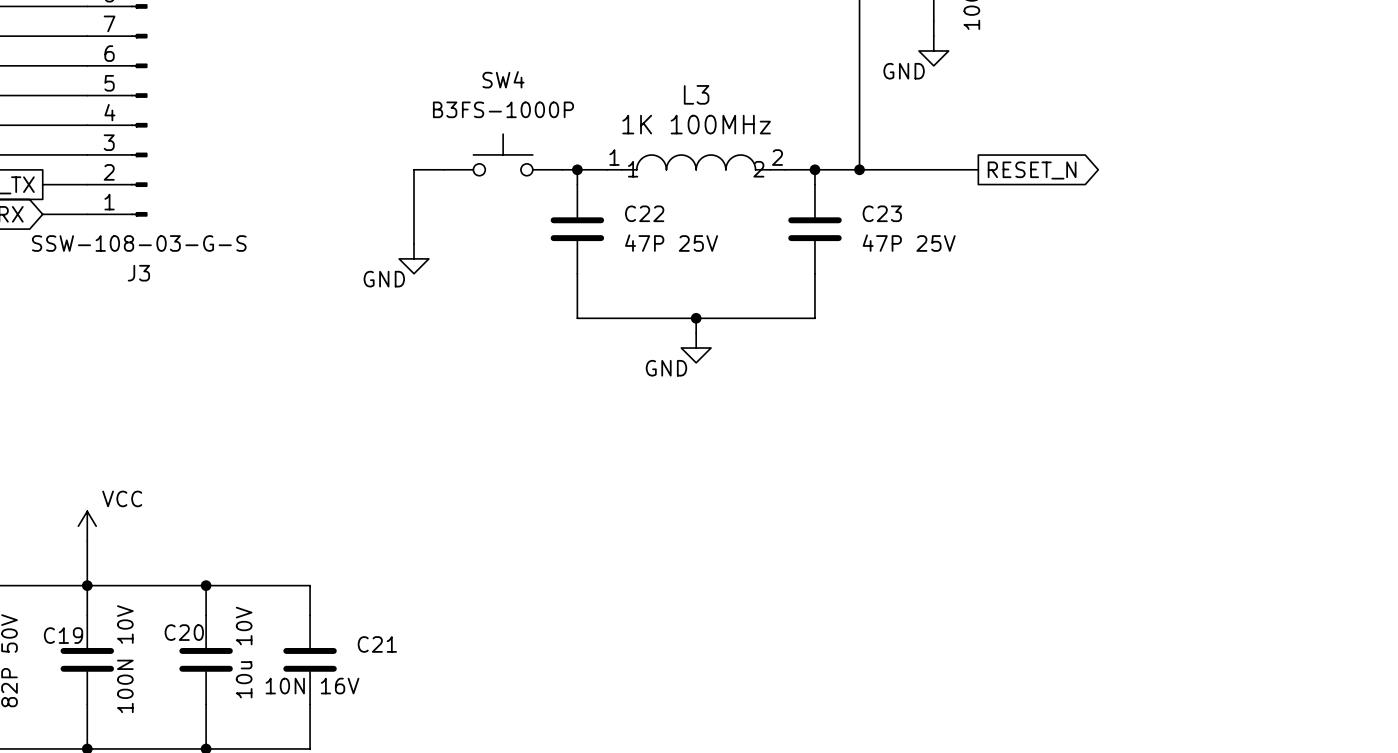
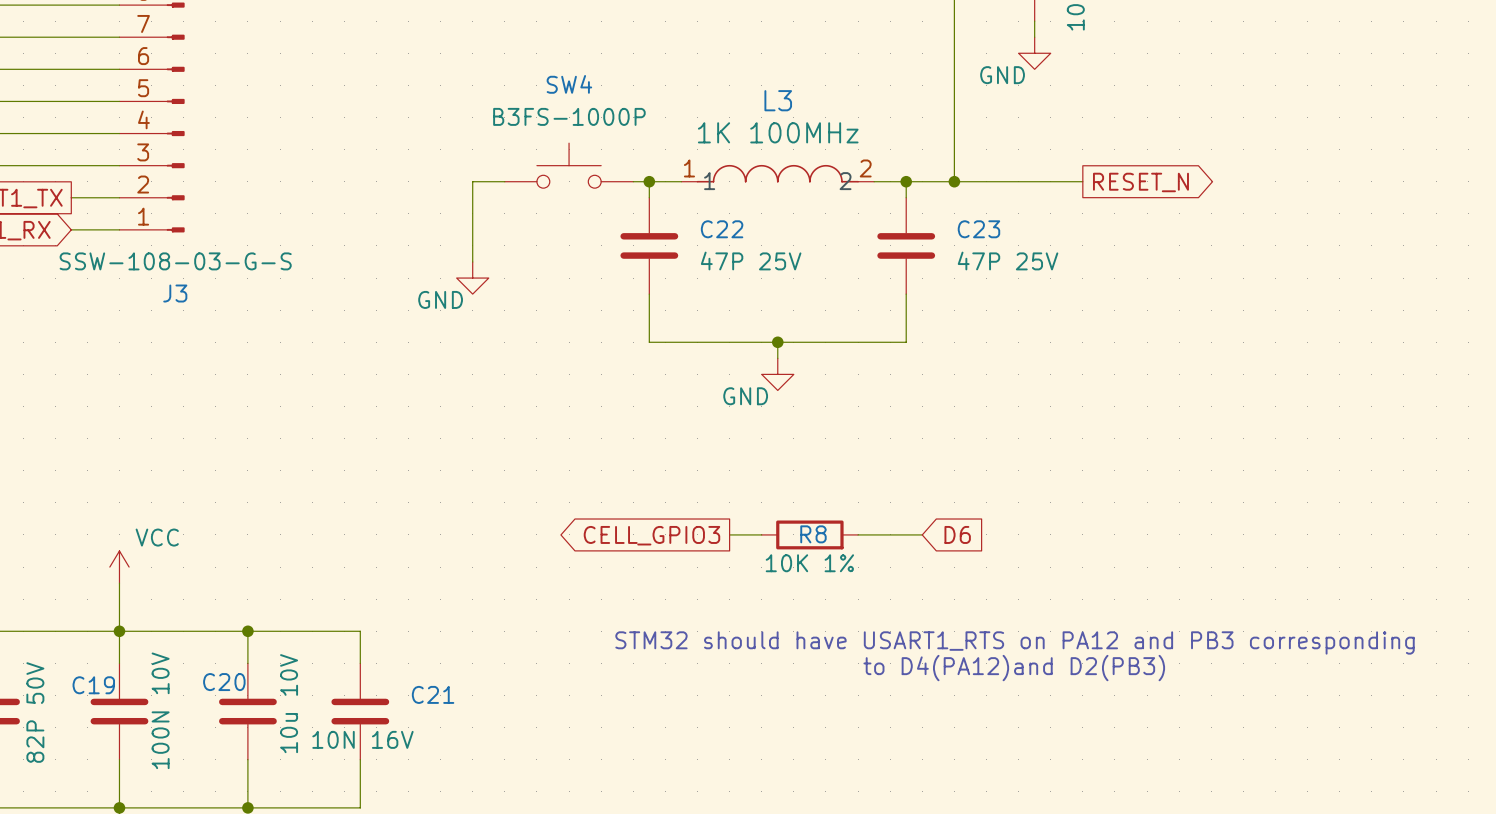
wire: none -> (729, 534) (761, 534)
R8: none -> 10K 1% (809, 534)
wire: none -> (858, 534) (922, 534)
global label: none -> D6 (957, 534)
global label: none -> CELL_GPIO3 (651, 535)
text: none -> STM32 should have USART1_RTS on PA12 and PB3 corresponding (1015, 642)
text: none -> to D4(PA12)and D2(PB3) (1014, 668)

